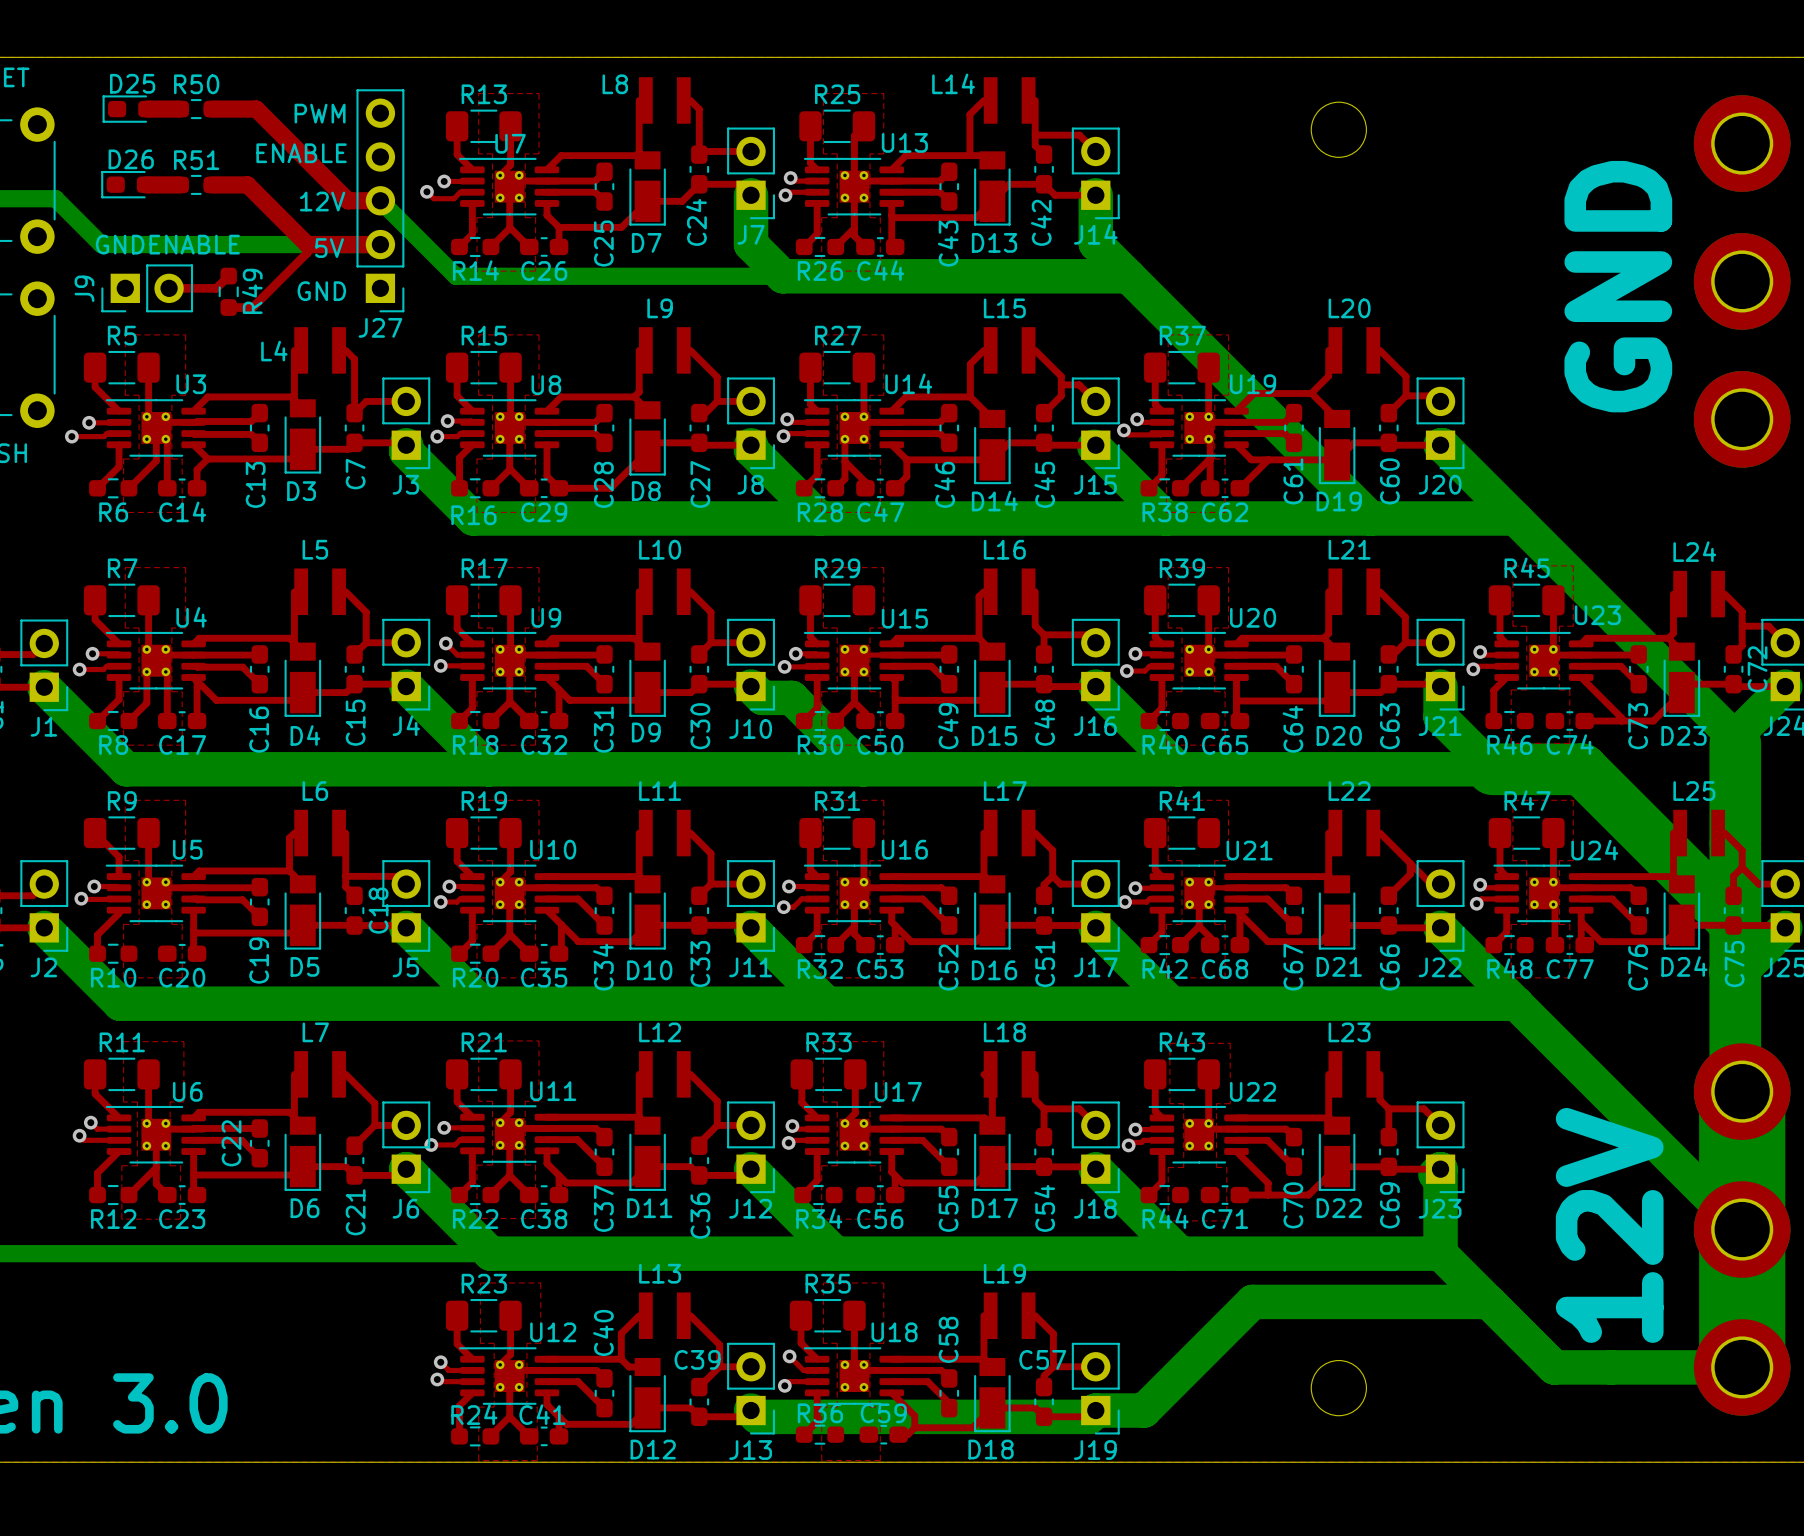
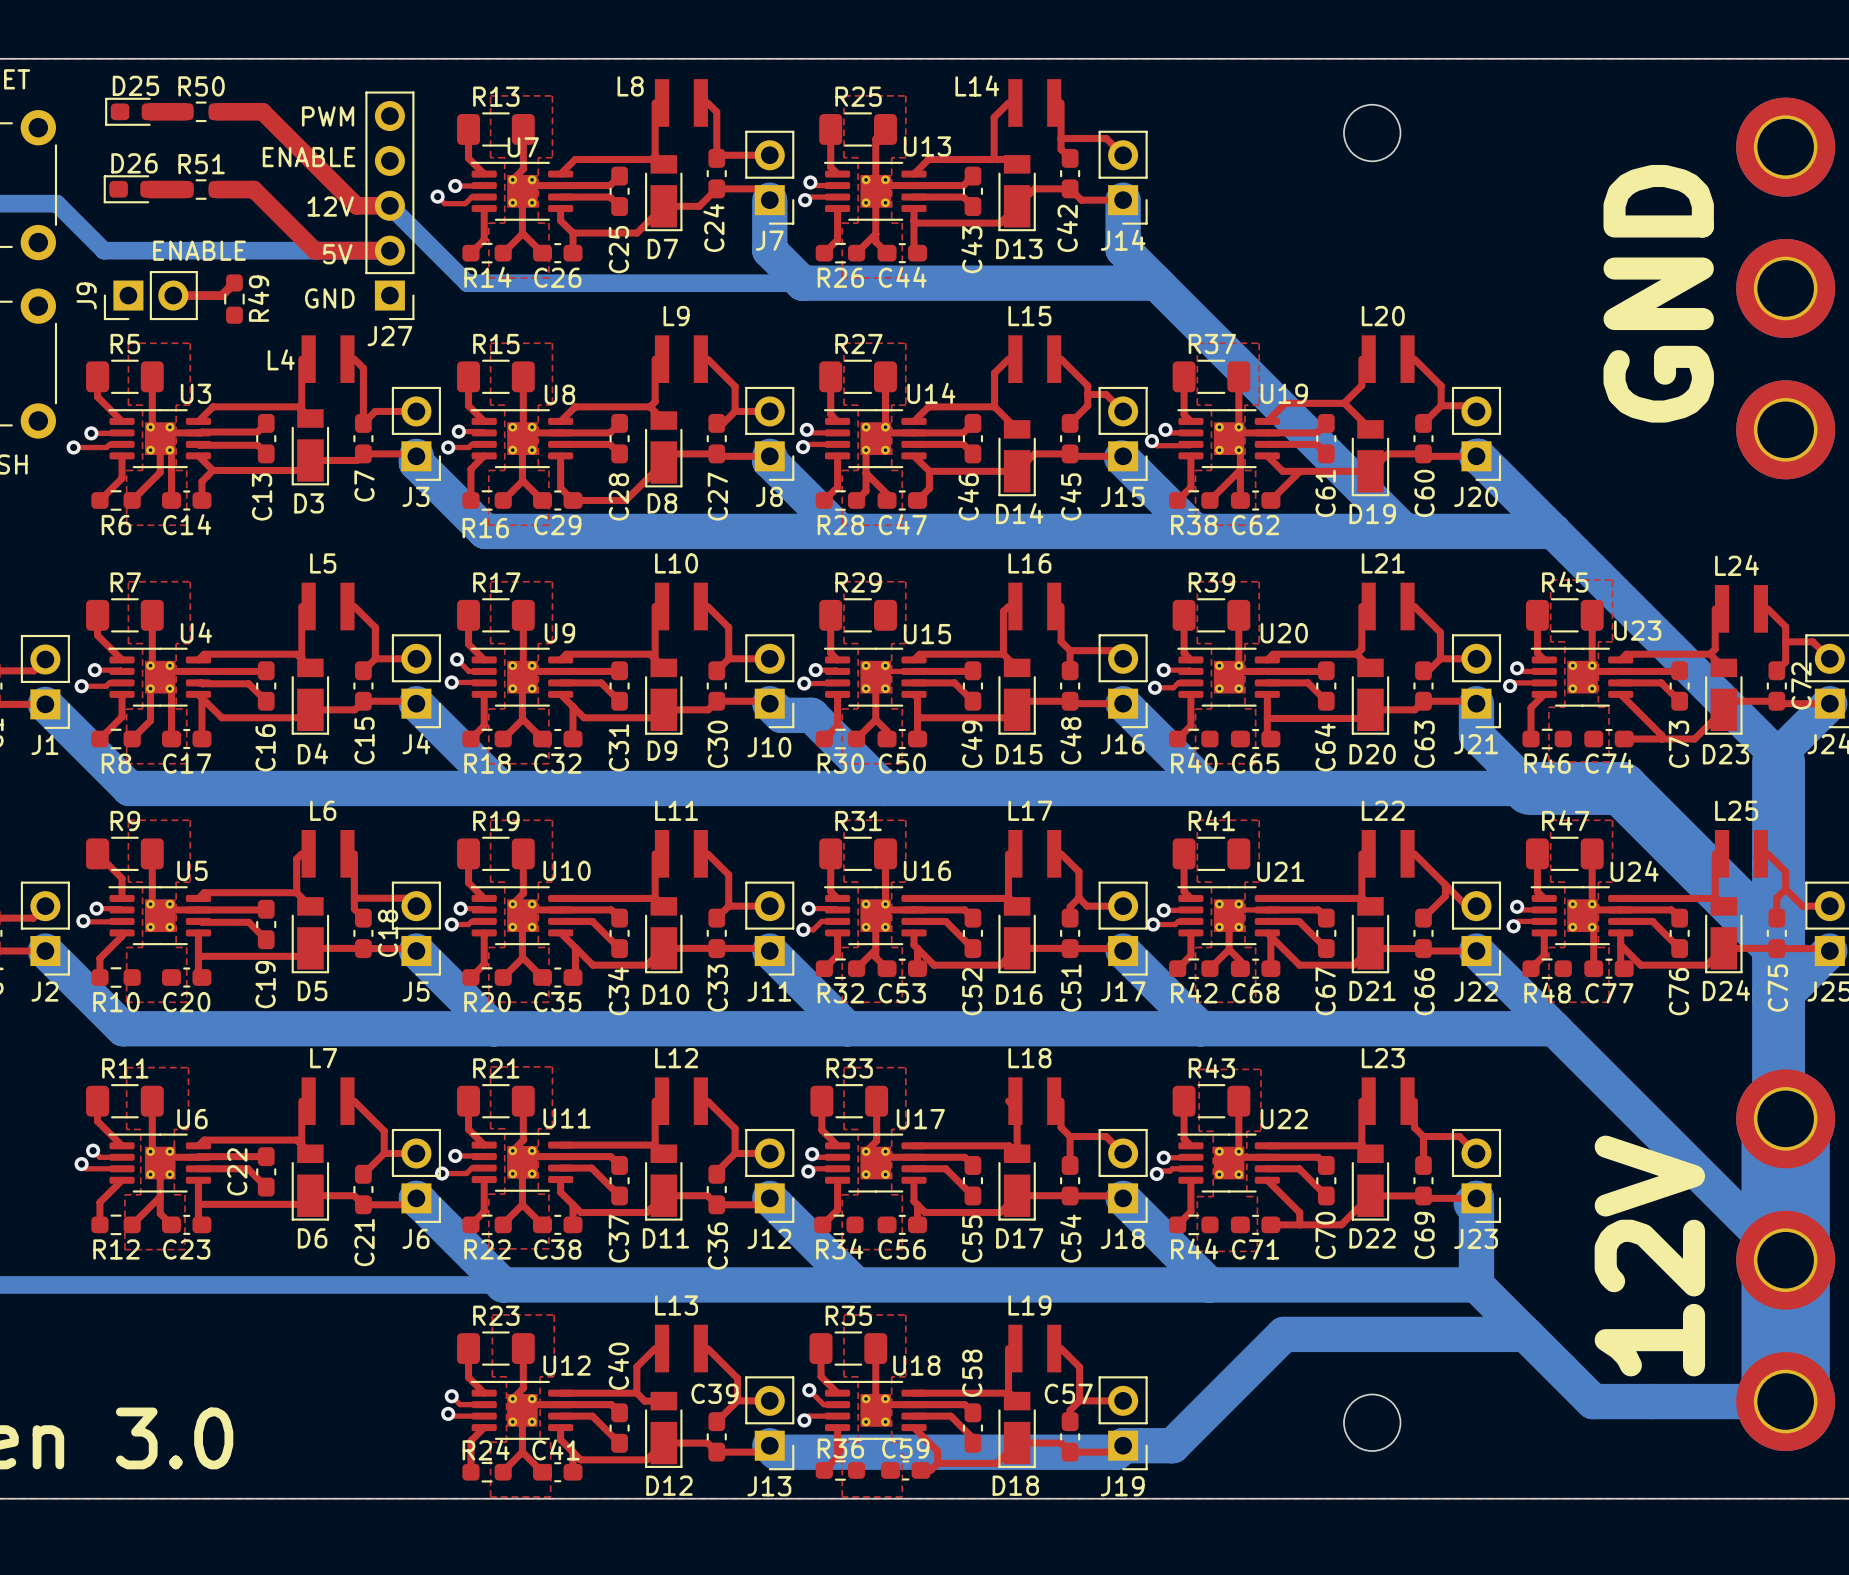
text: GND (120, 244) -> none
top track: (307, 244) (307, 252) (252, 307) (228, 307) -> none

